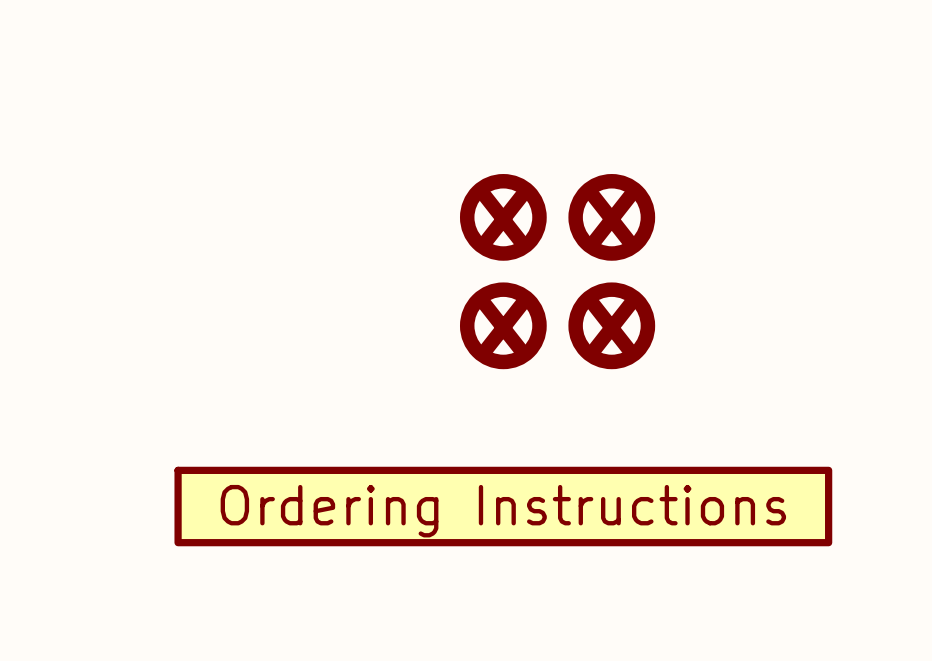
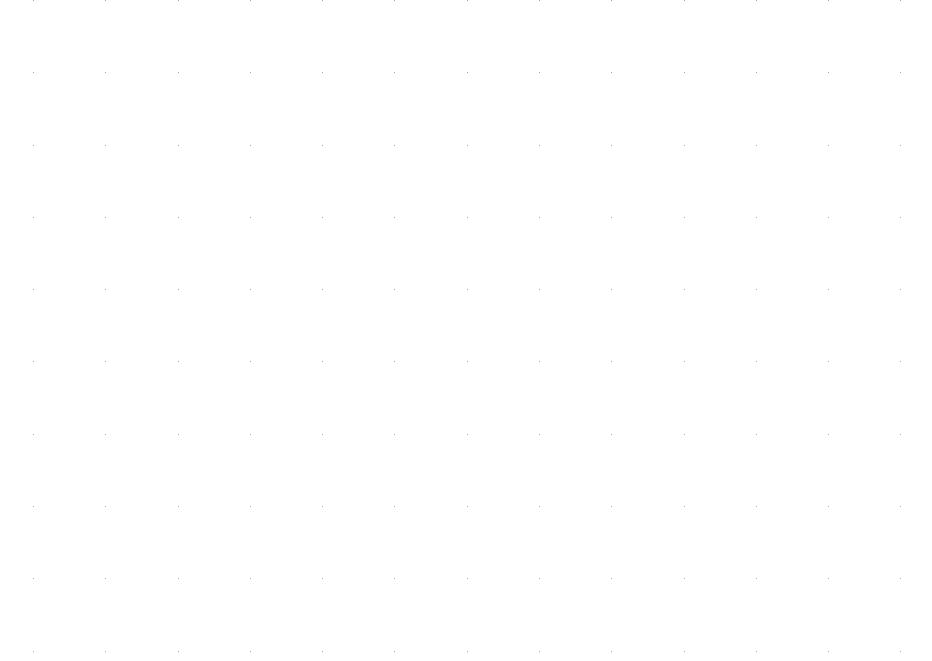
part: (503, 217) -> none
part: (611, 217) -> none
part: (503, 325) -> none
part: (611, 325) -> none
part: (503, 506) -> none

